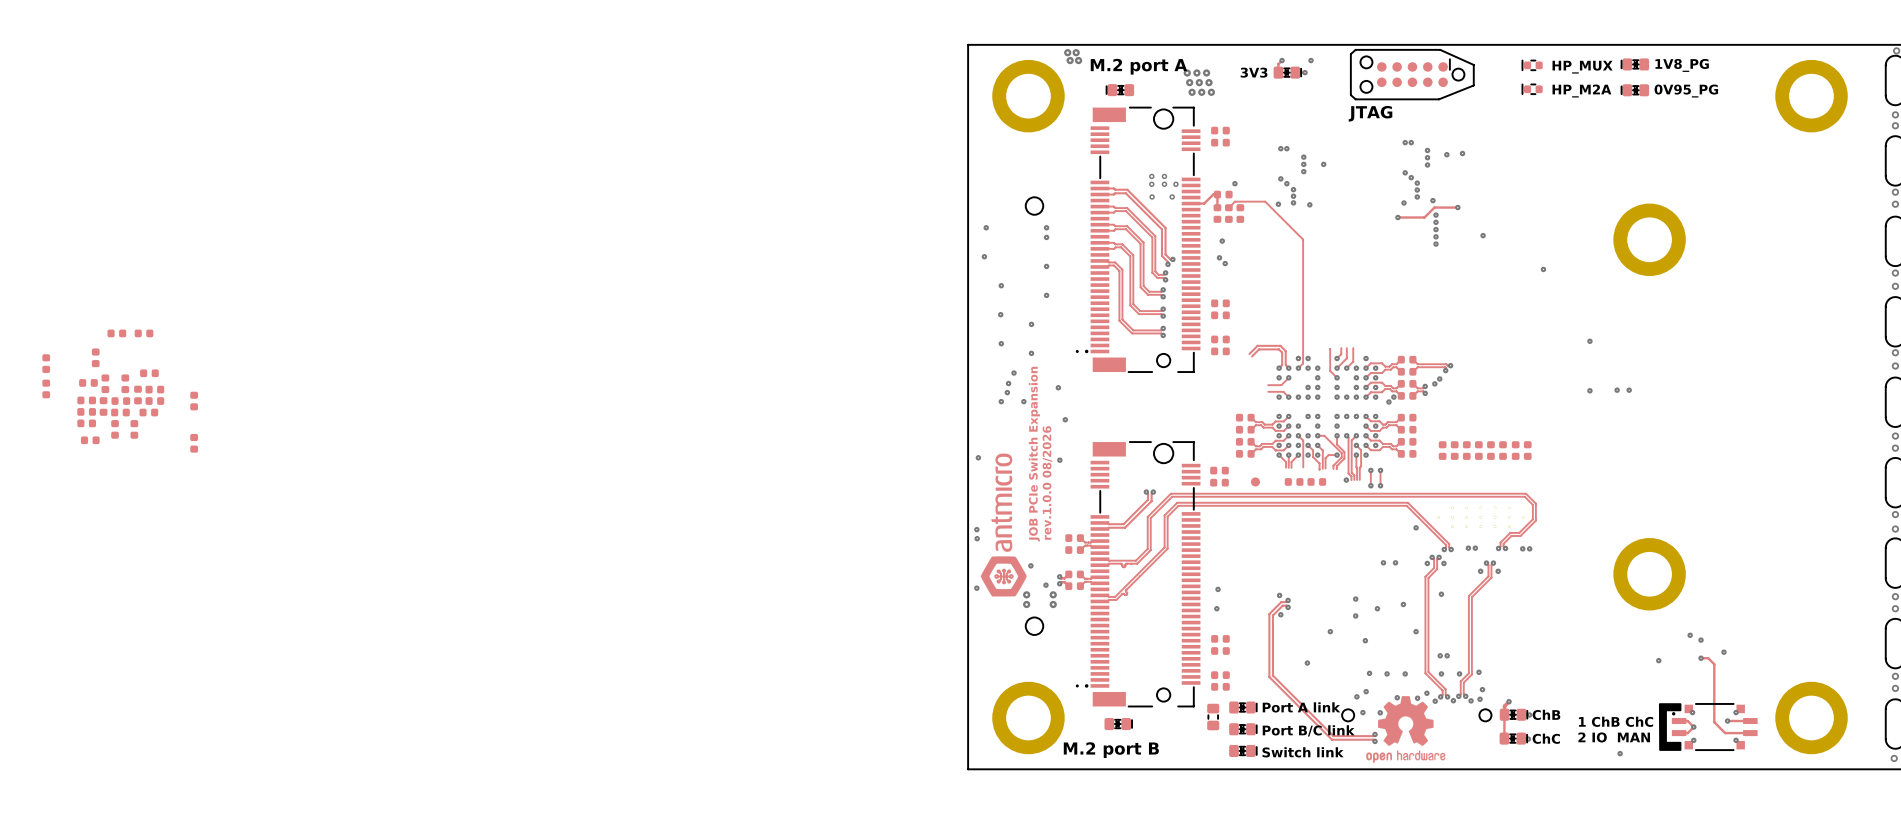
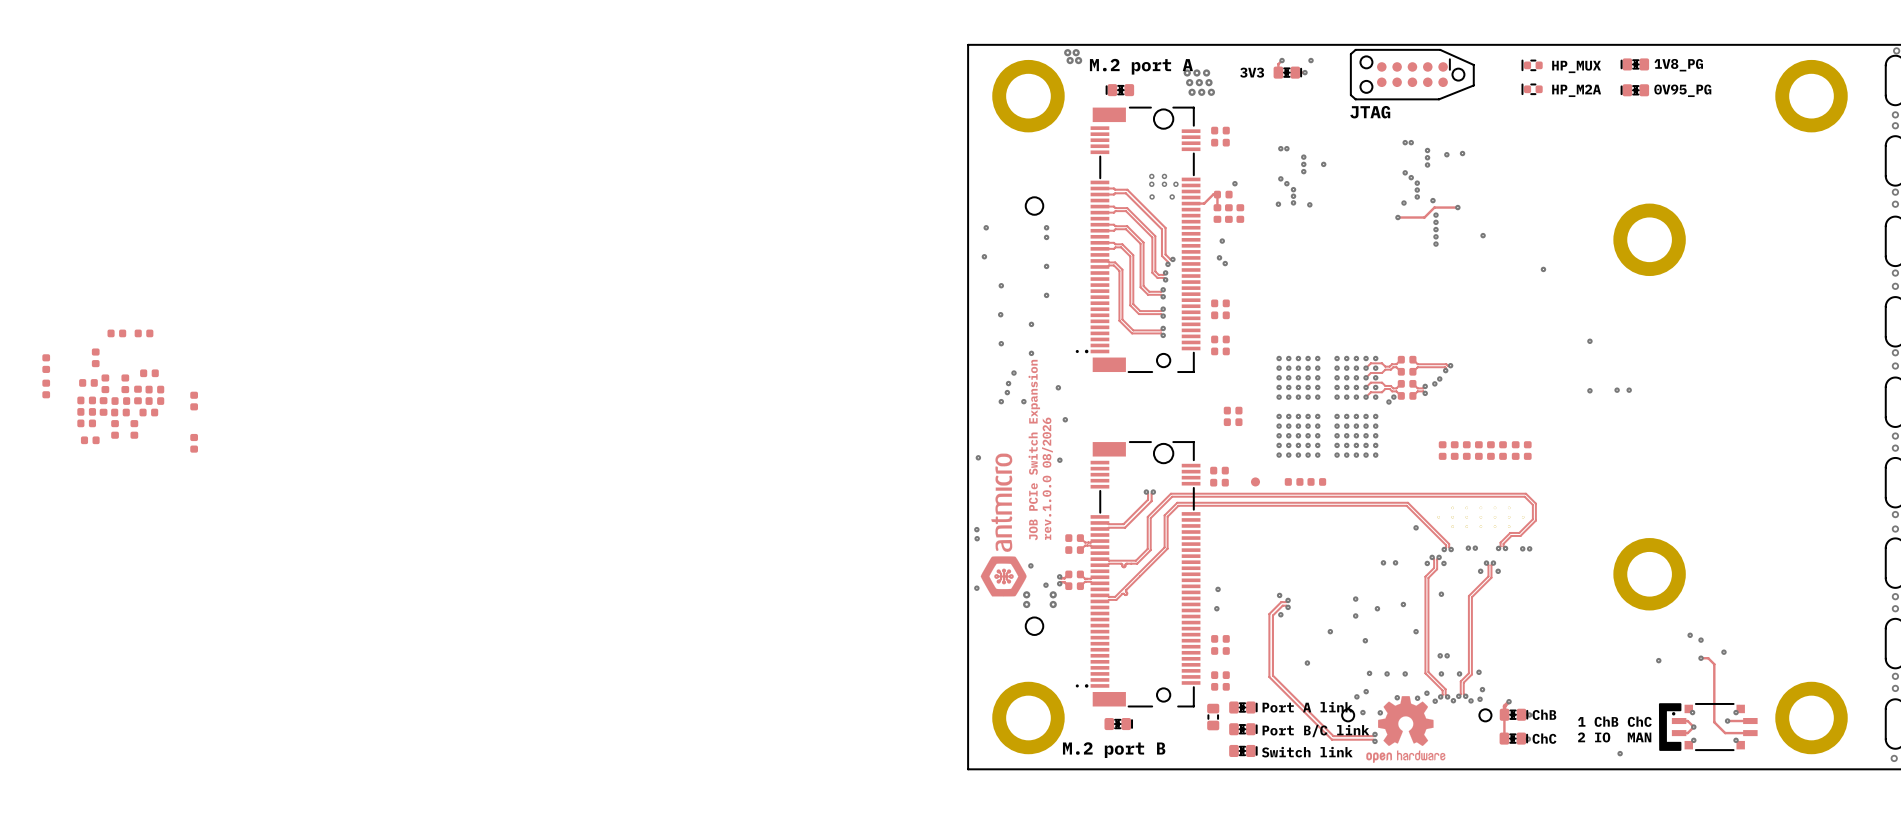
track: (1228, 207) (1234, 201) (1265, 201) (1303, 239) (1303, 363) (1298, 368) -> none
track: (1330, 348) (1330, 370) (1337, 377) -> none
track: (1341, 348) (1341, 354) (1337, 358) -> none
track: (1346, 348) (1346, 358) (1337, 368) -> none
track: (1353, 348) (1353, 361) (1346, 368) -> none
track: (1249, 353) (1257, 345) (1280, 345) (1285, 351) (1285, 365) (1288, 368) -> none
track: (1251, 356) (1259, 349) (1278, 349) (1282, 352) (1282, 365) (1279, 368) -> none
via: none -> (1279, 358)
via: none -> (1288, 358)
via: none -> (1317, 358)
via: none -> (1346, 358)
via: none -> (1356, 358)
via: none -> (1375, 358)
track: (1288, 377) (1281, 385) (1268, 385) -> none
via: none -> (1298, 377)
via: none -> (1308, 377)
via: none -> (1346, 377)
via: none -> (1279, 387)
via: none -> (1288, 387)
via: none -> (1298, 387)
via: none -> (1346, 387)
track: (1268, 391) (1283, 391) (1288, 397) -> none
part: none -> (1233, 410)
track: (1288, 416) (1283, 421) (1275, 421) (1272, 424) (1255, 422) (1251, 417) -> none
via: none -> (1298, 416)
track: (1366, 416) (1370, 421) (1379, 421) (1382, 424) (1387, 422) (1396, 422) (1401, 417) -> none
part: (1245, 417) -> none
part: (1407, 417) -> none
part: none -> (1233, 422)
track: (1288, 426) (1284, 430) (1275, 430) (1272, 427) (1263, 427) (1261, 425) (1255, 425) (1251, 429) -> none
via: none -> (1308, 426)
via: none -> (1346, 426)
via: none -> (1356, 426)
track: (1366, 426) (1370, 430) (1379, 430) (1389, 425) (1396, 425) (1401, 429) -> none
part: (1245, 429) -> none
part: (1407, 429) -> none
track: (1288, 435) (1283, 440) (1275, 440) (1272, 443) (1262, 443) (1259, 446) (1255, 446) (1251, 441) -> none
track: (1298, 435) (1303, 440) (1303, 467) -> none
track: (1317, 435) (1324, 435) (1341, 453) (1341, 457) (1333, 465) (1333, 468) -> none
track: (1337, 435) (1337, 444) (1344, 452) (1344, 458) (1336, 469) -> none
track: (1346, 435) (1348, 437) (1348, 473) (1351, 480) -> none
track: (1356, 435) (1351, 440) (1351, 472) (1354, 475) (1354, 479) -> none
track: (1366, 435) (1370, 440) (1379, 440) (1382, 443) (1390, 443) (1393, 446) (1396, 446) (1401, 441) -> none
part: (1245, 441) -> none
part: (1407, 441) -> none
track: (1288, 445) (1283, 450) (1263, 446) (1261, 449) (1255, 449) (1251, 453) -> none
track: (1308, 445) (1313, 450) (1313, 457) (1319, 463) (1319, 469) -> none
track: (1317, 445) (1322, 450) (1322, 468) -> none
via: none -> (1337, 445)
via: none -> (1346, 445)
track: (1356, 445) (1361, 450) (1359, 479) -> none
track: (1366, 445) (1370, 450) (1379, 450) (1382, 446) (1389, 446) (1401, 453) -> none
part: (1245, 453) -> none
part: (1407, 453) -> none
track: (1279, 455) (1286, 462) (1286, 467) -> none
track: (1288, 455) (1288, 467) -> none
track: (1298, 455) (1291, 462) (1291, 467) -> none
track: (1337, 455) (1328, 455) (1325, 458) (1325, 468) -> none
via: none -> (1346, 455)
track: (1356, 455) (1357, 479) -> none
via: none -> (1375, 455)
track: (1370, 470) (1370, 485) -> none
via: (1370, 470) -> none
track: (1380, 470) (1380, 485) -> none
via: (1380, 470) -> none
via: (1346, 480) -> none
via: (1370, 485) -> none
via: (1380, 485) -> none

